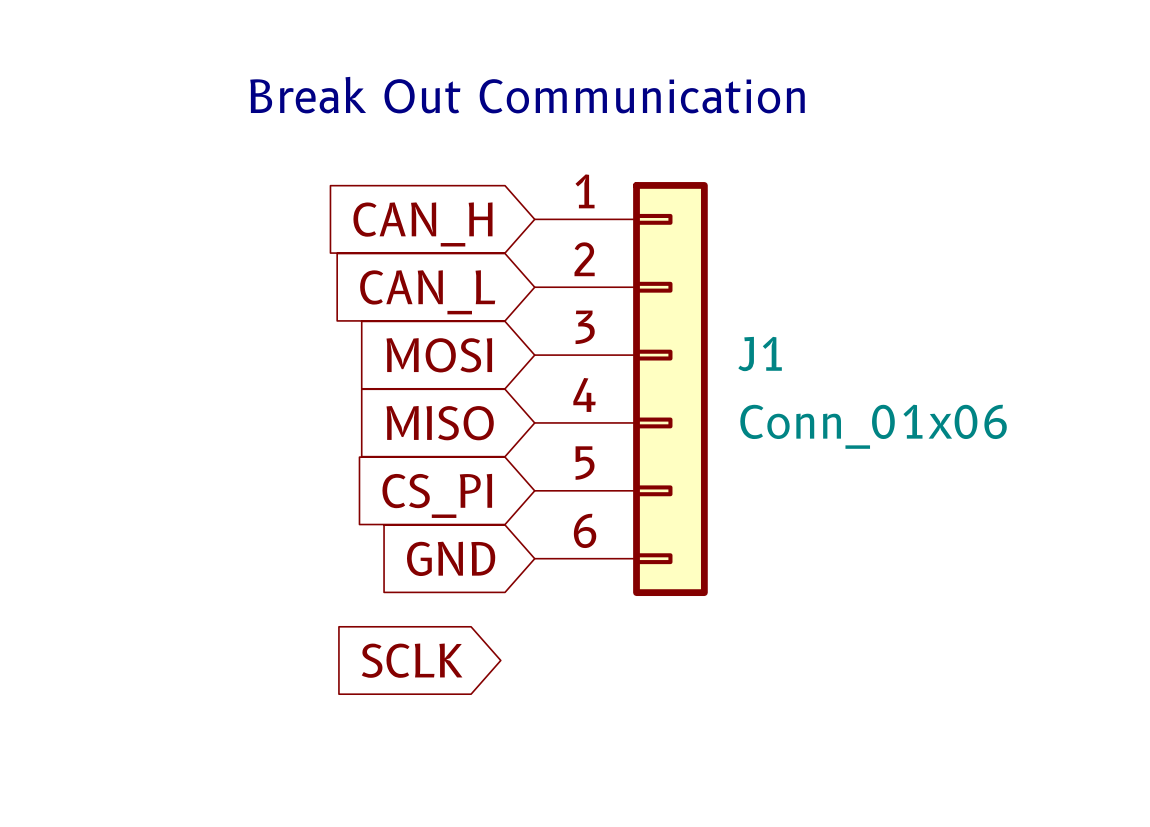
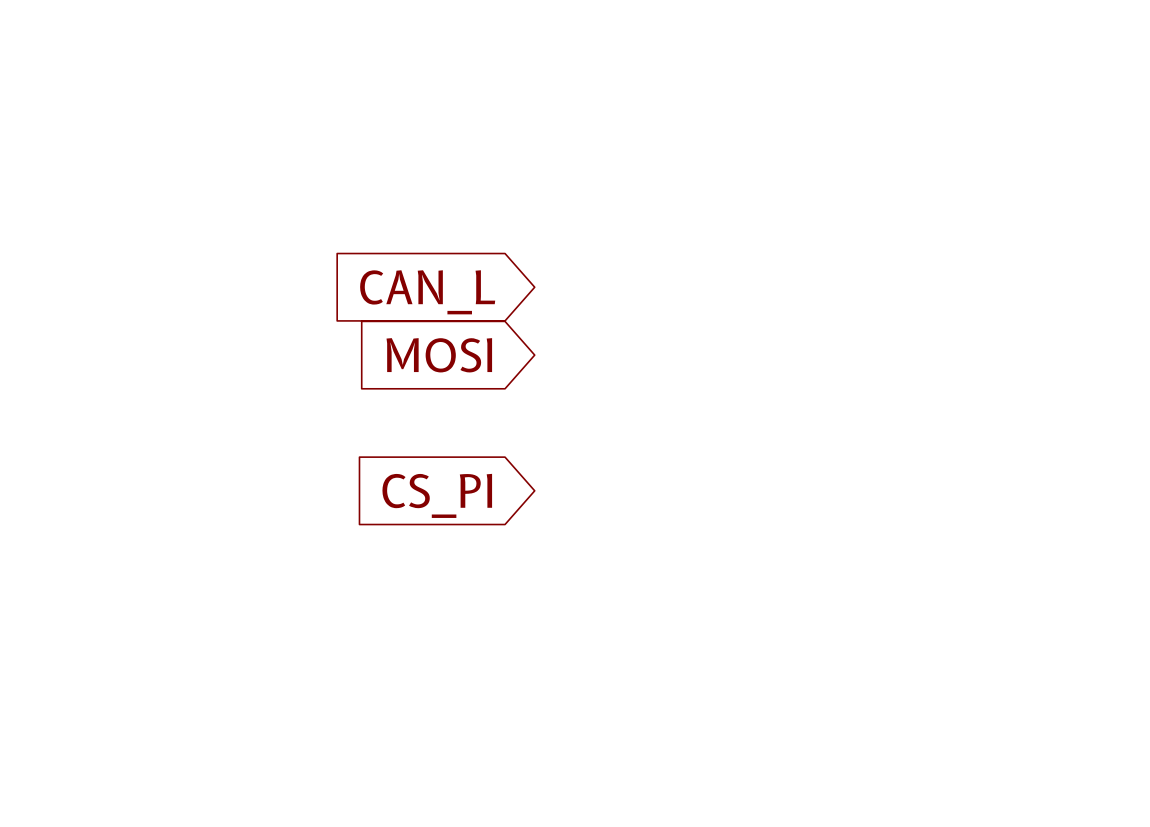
text: Break Out Communication (527, 95) -> none
global label: CAN_H (422, 224) -> none
J1: Conn_01x06 (621, 389) -> none
global label: MISO (440, 423) -> none
global label: GND (451, 558) -> none
global label: SCLK (412, 660) -> none

